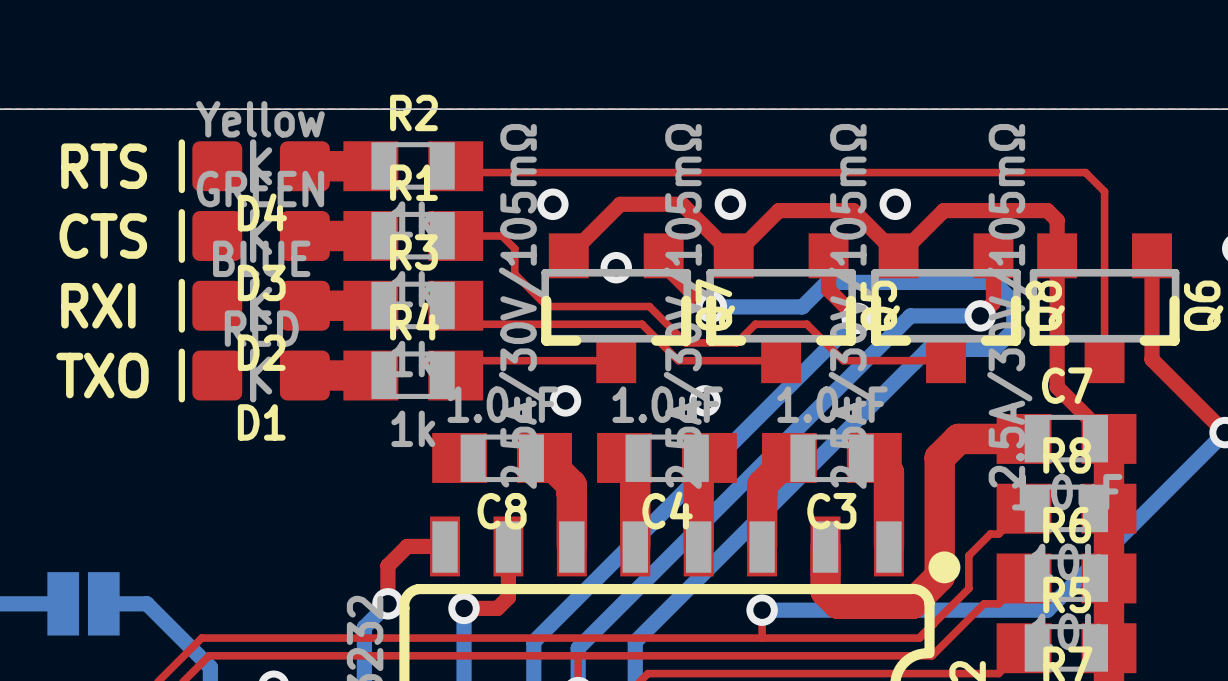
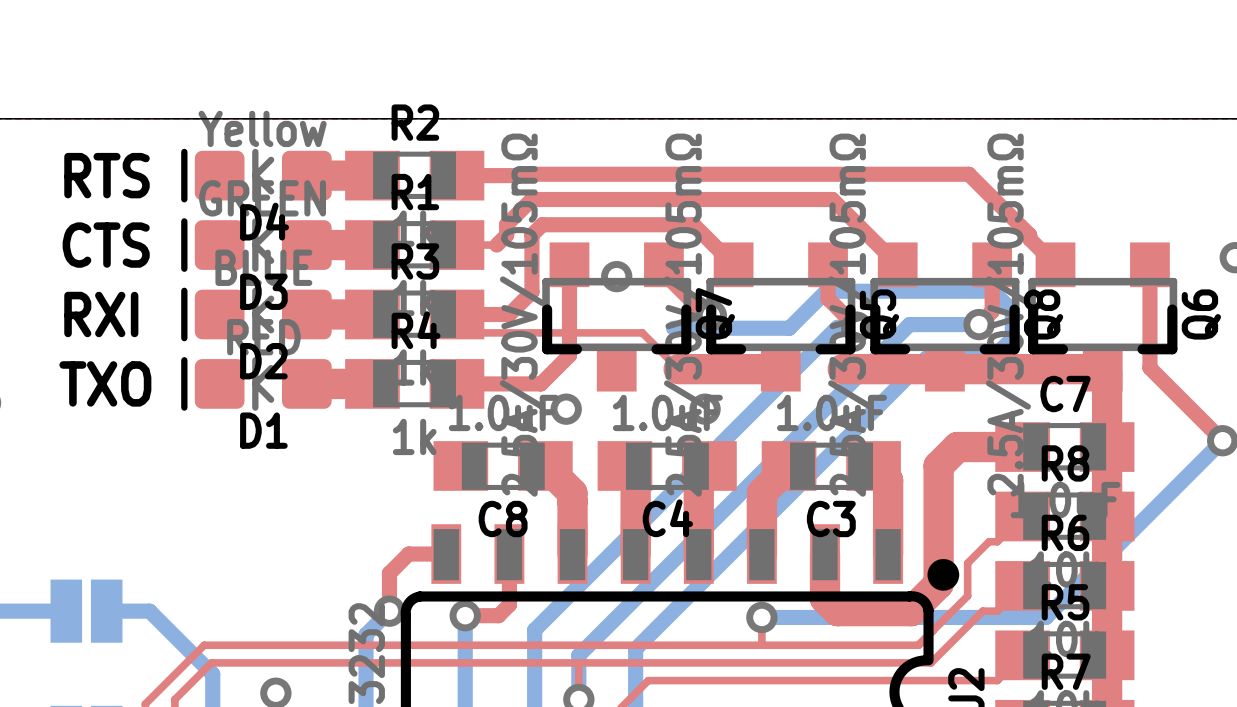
top track: (455, 166) (462, 172) (1085, 172) (1104, 191) (1104, 360) -> (456, 175) (968, 174) (1029, 235) (1029, 238) (1055, 264)
via: (552, 204) -> none
via: (730, 204) -> none
via: (895, 204) -> none
top track: (853, 210) (778, 210) (733, 255) -> none
top track: (693, 215) (682, 204) (620, 204) (568, 255) -> (693, 224) (542, 224) (531, 235) (531, 291) (509, 314) (456, 314)
top track: (495, 235) (502, 235) (514, 248) (514, 274) (547, 306) (649, 306) (685, 342) (736, 342) (755, 324) (806, 324) (843, 360) -> (496, 245) (506, 235) (506, 224) (531, 199) (832, 199) (852, 219)
top track: (898, 255) (943, 210) (1047, 210) (1057, 220) (1057, 387) (1108, 438) -> (944, 369) (1102, 369) (1107, 373) (1107, 447)
bottom track: (711, 306) (802, 306) -> (673, 328) (789, 328) (801, 315)
bottom track: (857, 318) (533, 641) -> (837, 327) (534, 630) (534, 649)
top track: (616, 360) (470, 360) (455, 375) -> (569, 264) (569, 355) (540, 383) (456, 383)
top track width: thin (678, 360) (781, 360) -> thick (678, 369) (780, 369)
top track width: thin (843, 360) (946, 360) -> thick (842, 369) (944, 369)

